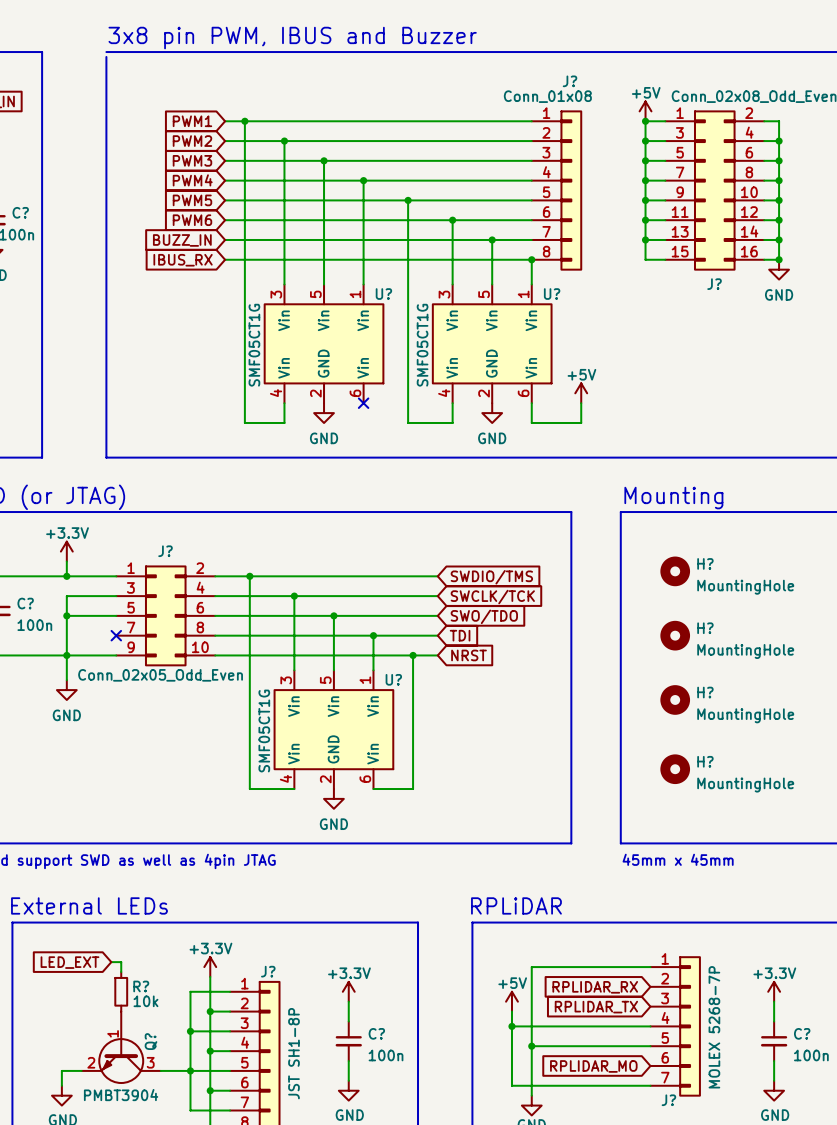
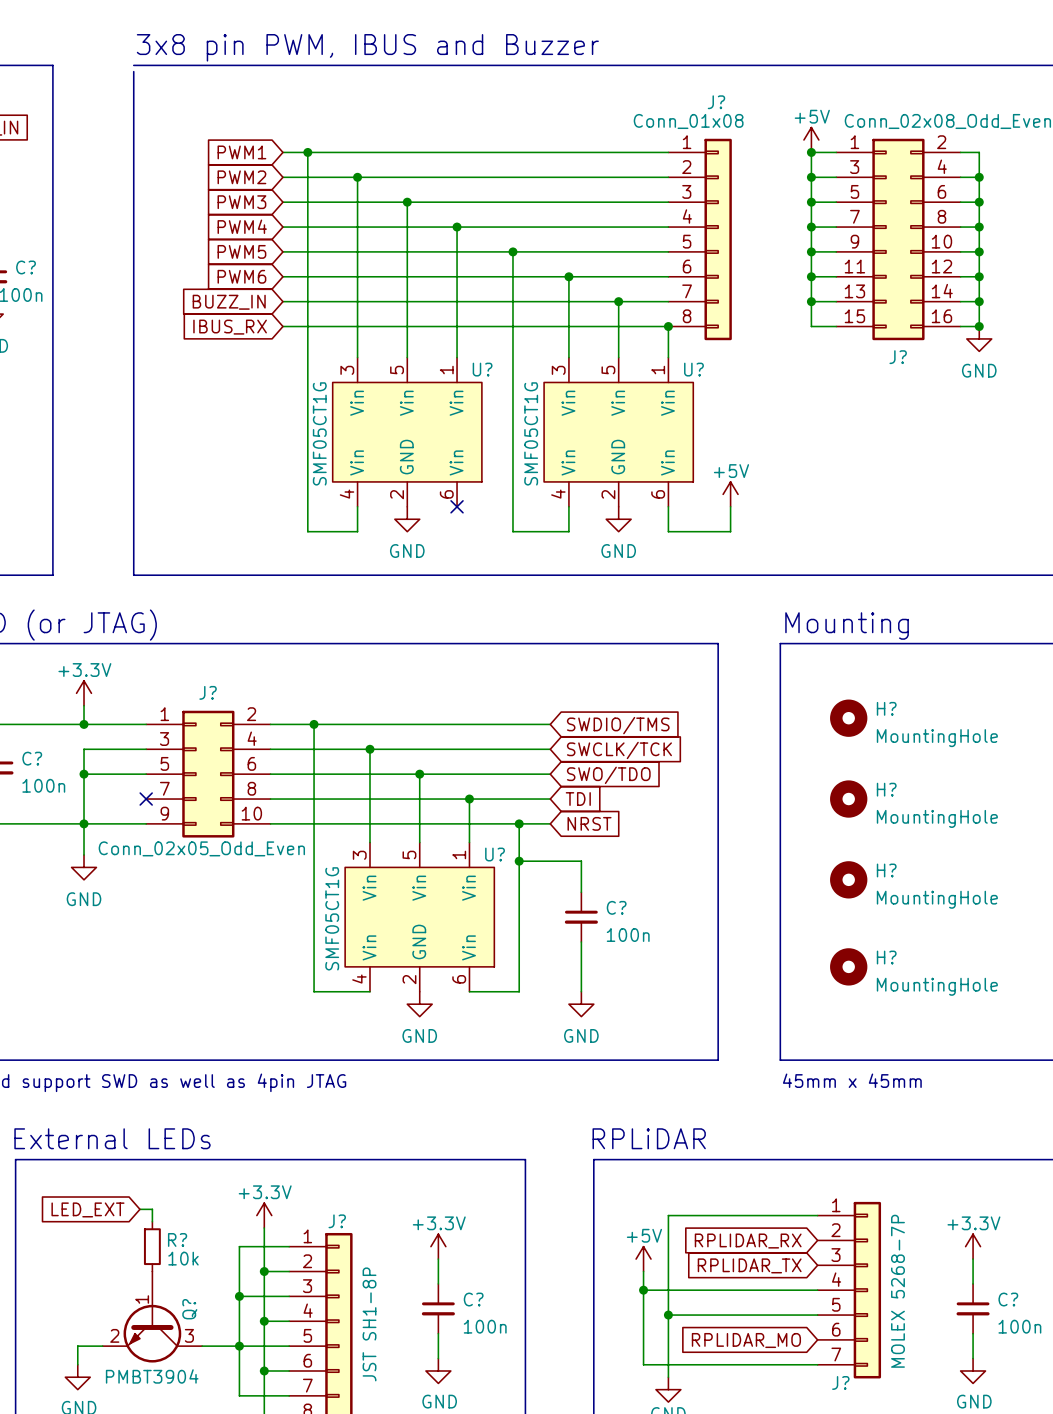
wire: none -> (519, 861) (581, 861) (581, 892)
junction: none -> (519, 861)
C?: none -> 100n (581, 917)
wire: none -> (581, 942) (581, 991)
power symbol: none -> GND (581, 1004)

